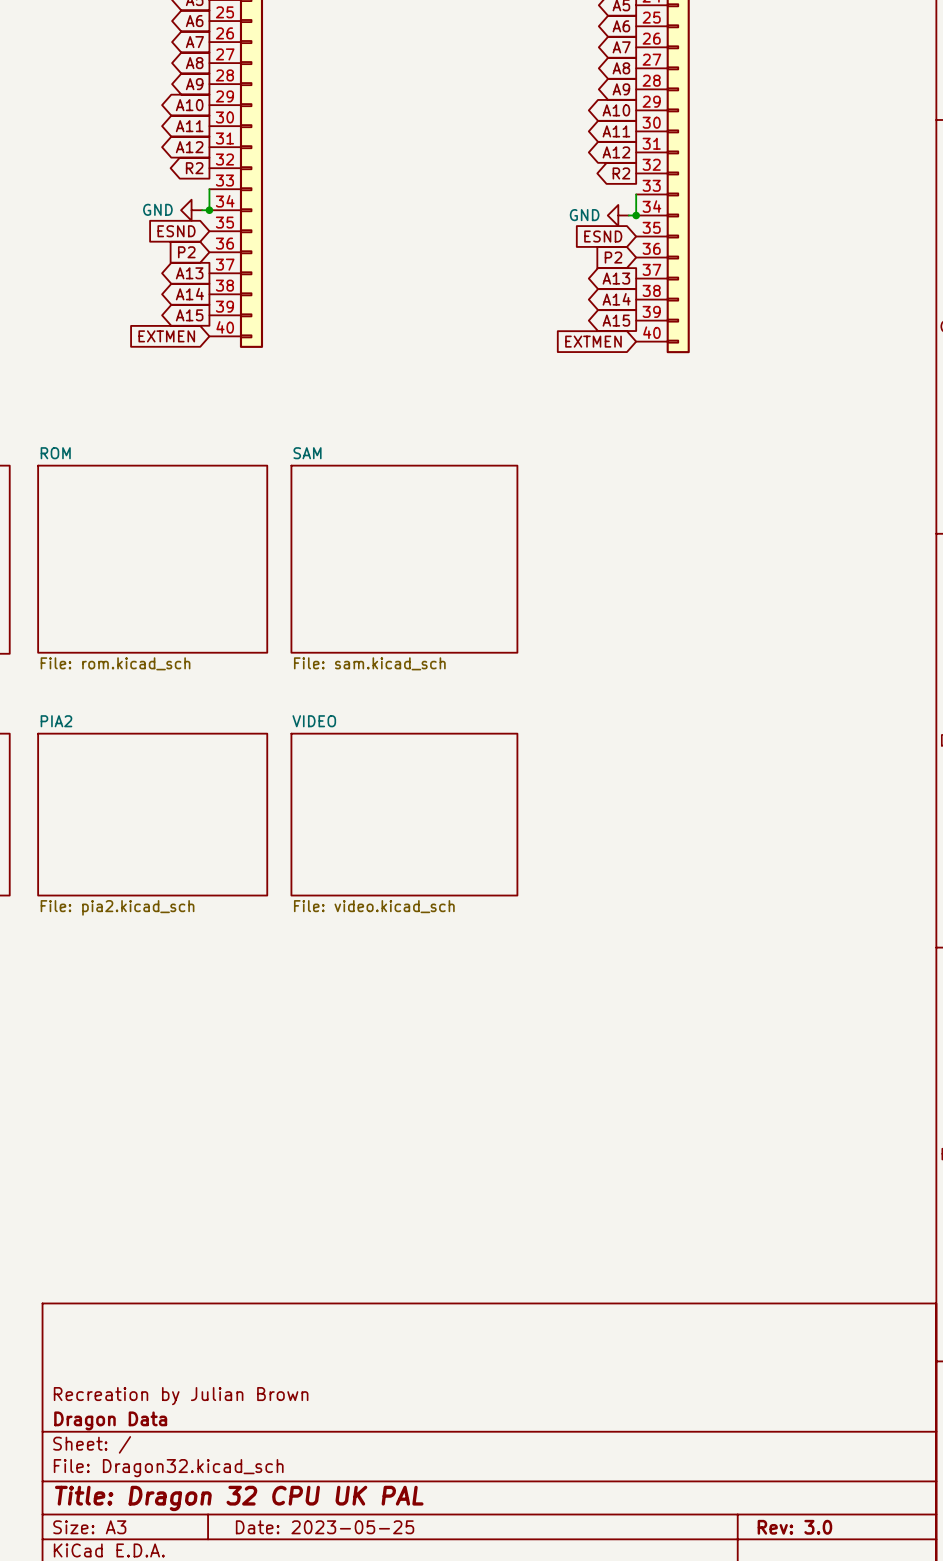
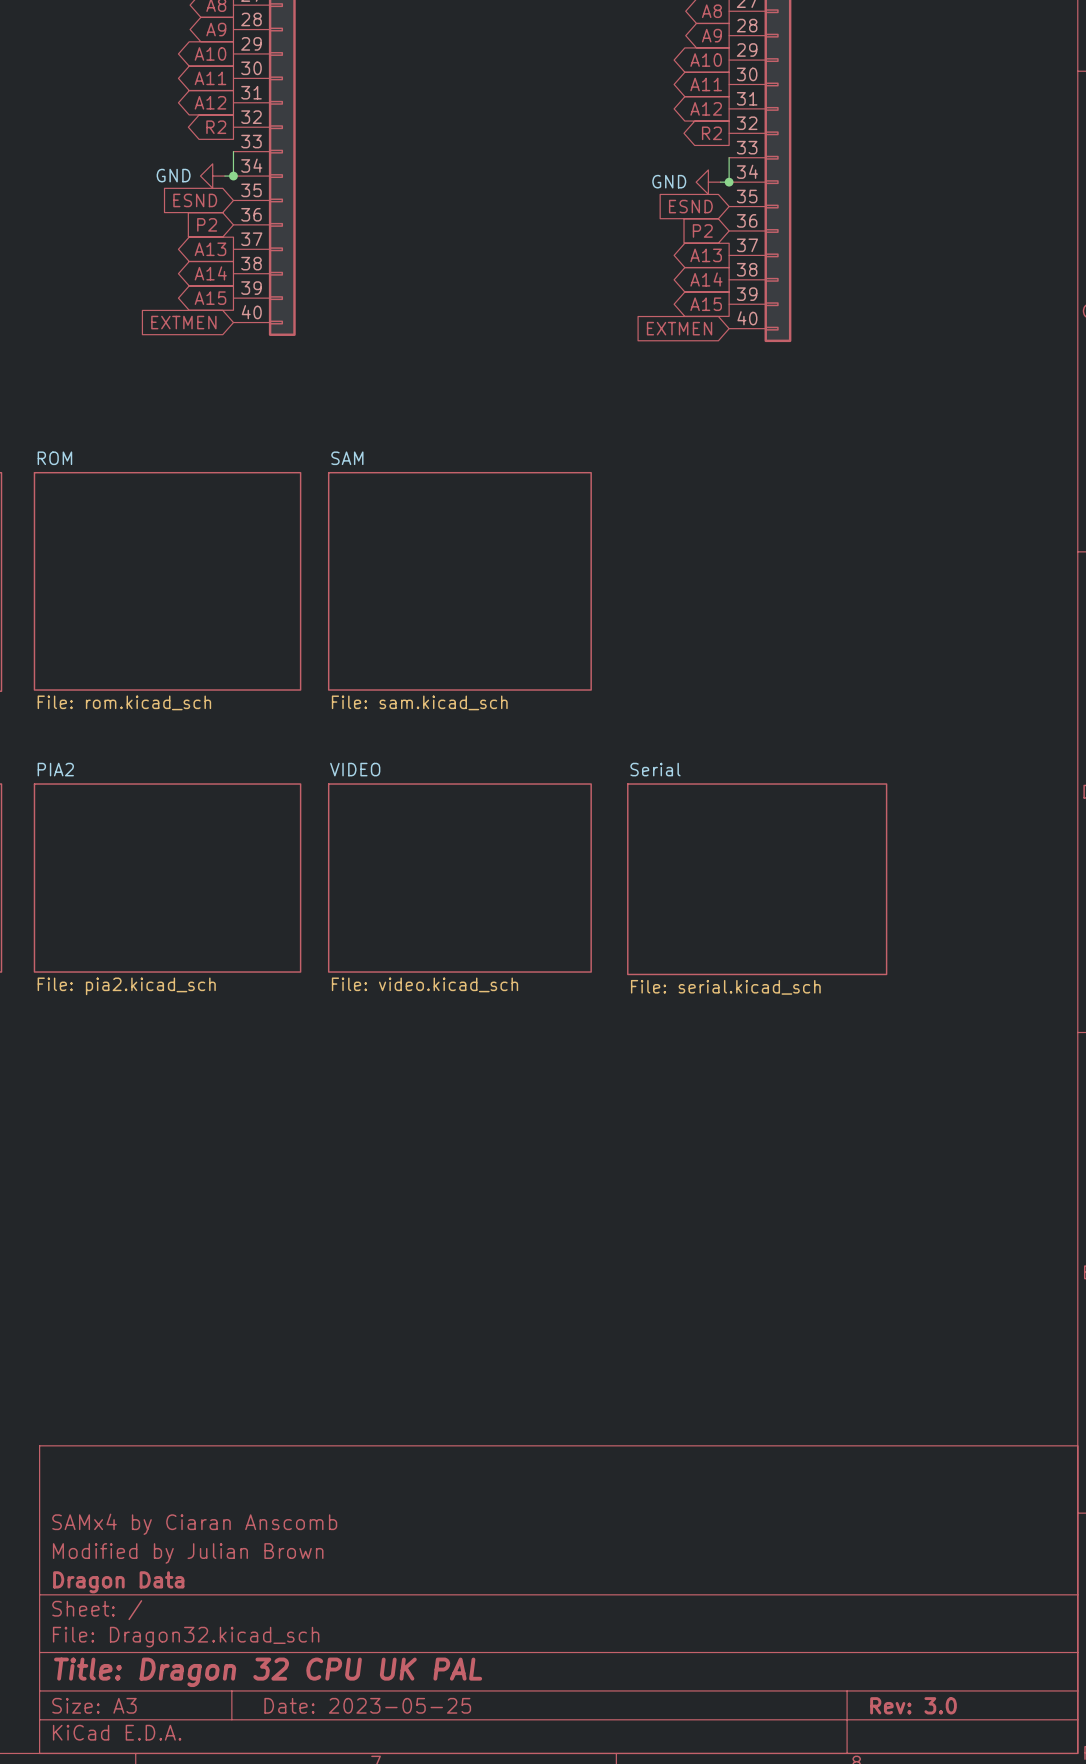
sheet Serial: none -> File: serial.kicad_sch (757, 879)
title block: none -> SAMx4 by Ciaran Anscomb (194, 1524)
title block: Recreation by Julian Brown (181, 1396) -> Modified by Julian Brown (188, 1553)

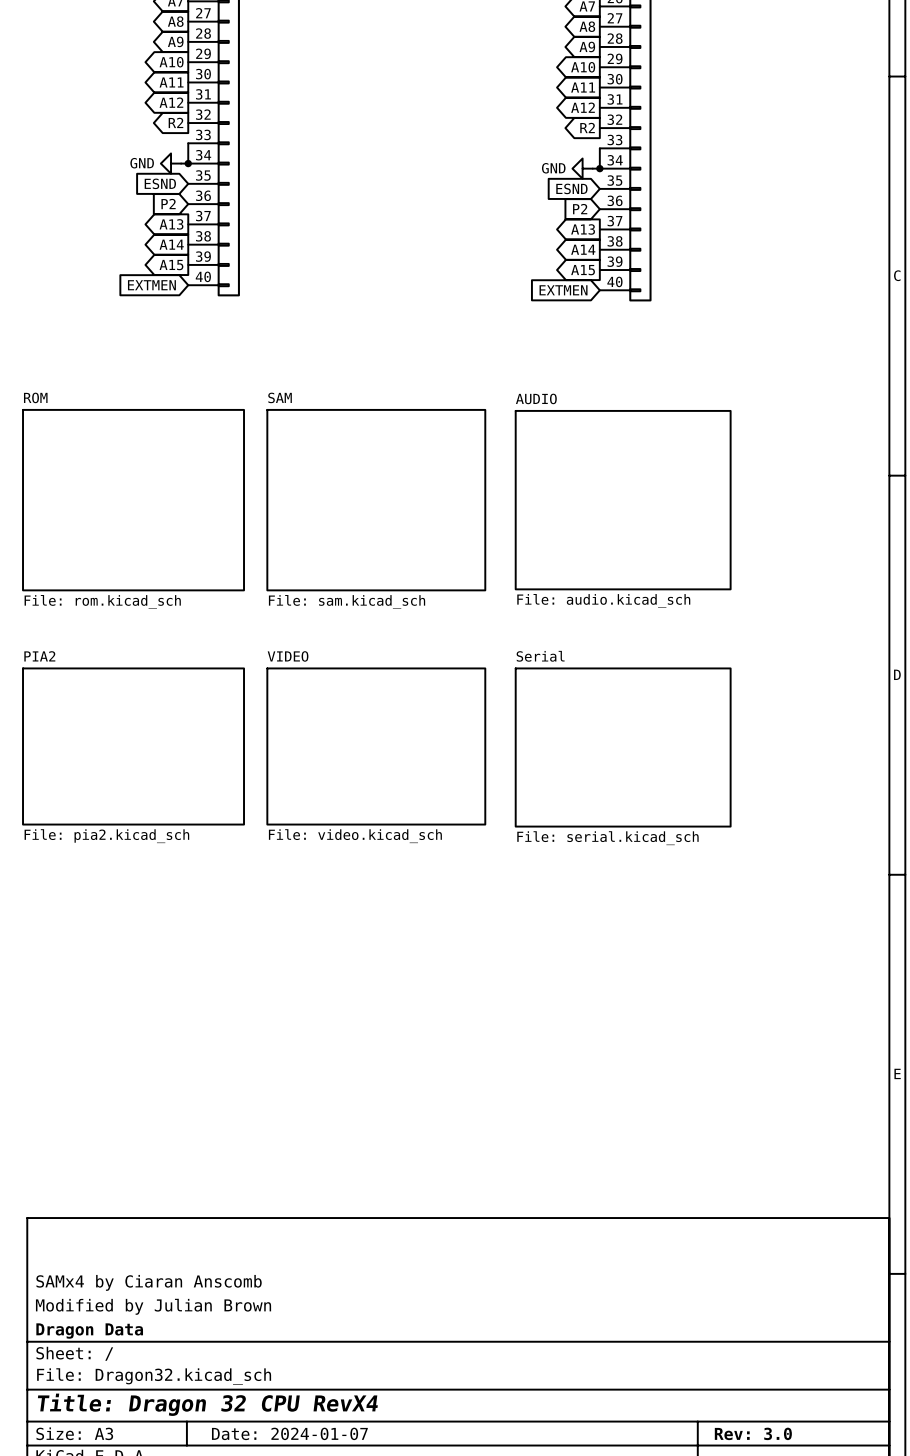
sheet AUDIO: none -> File: audio.kicad_sch (623, 500)
title block: Title: Dragon 32 CPU UK PAL (268, 1672) -> Title: Dragon 32 CPU RevX4 (207, 1404)
title block: Date: 2023-05-25 (367, 1705) -> Date: 2024-01-07 (289, 1433)

